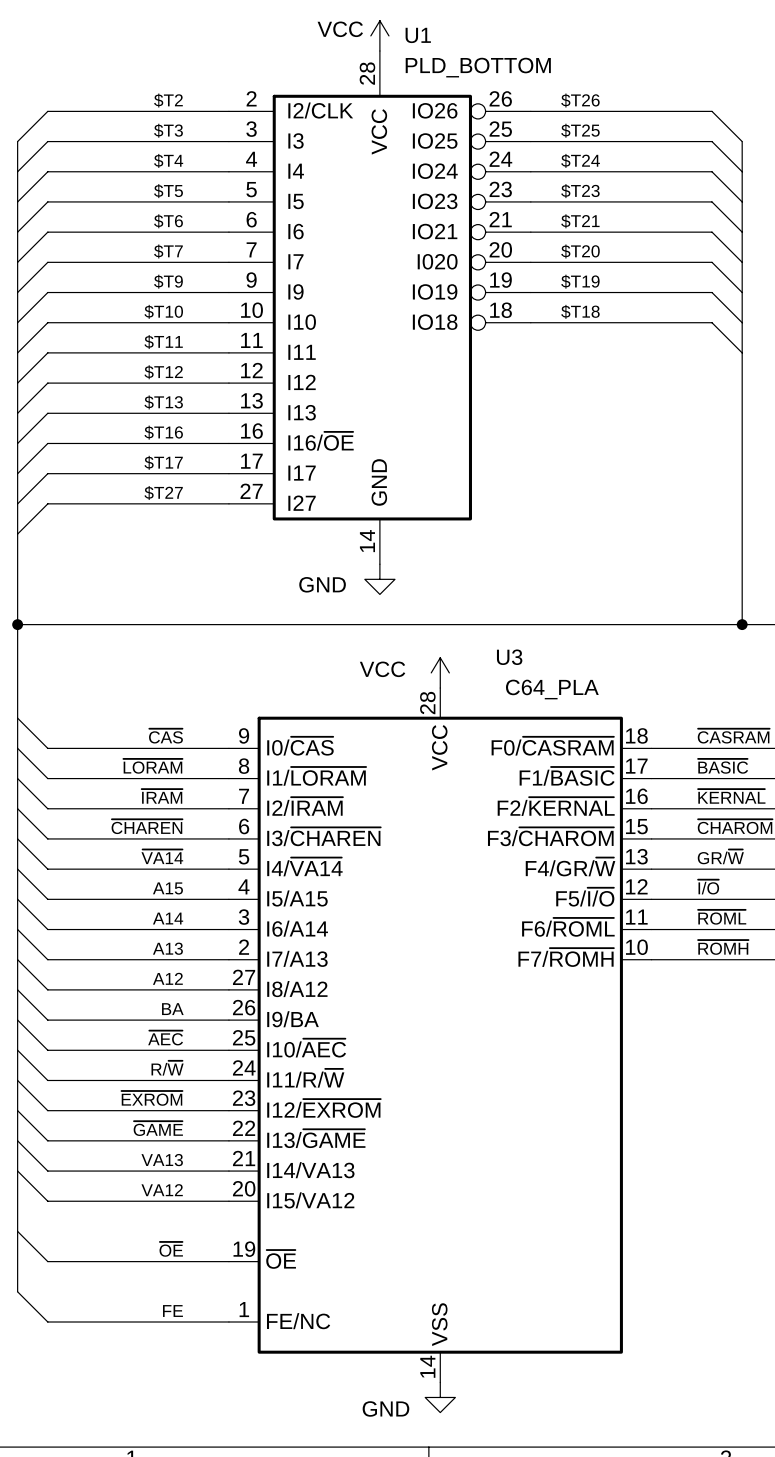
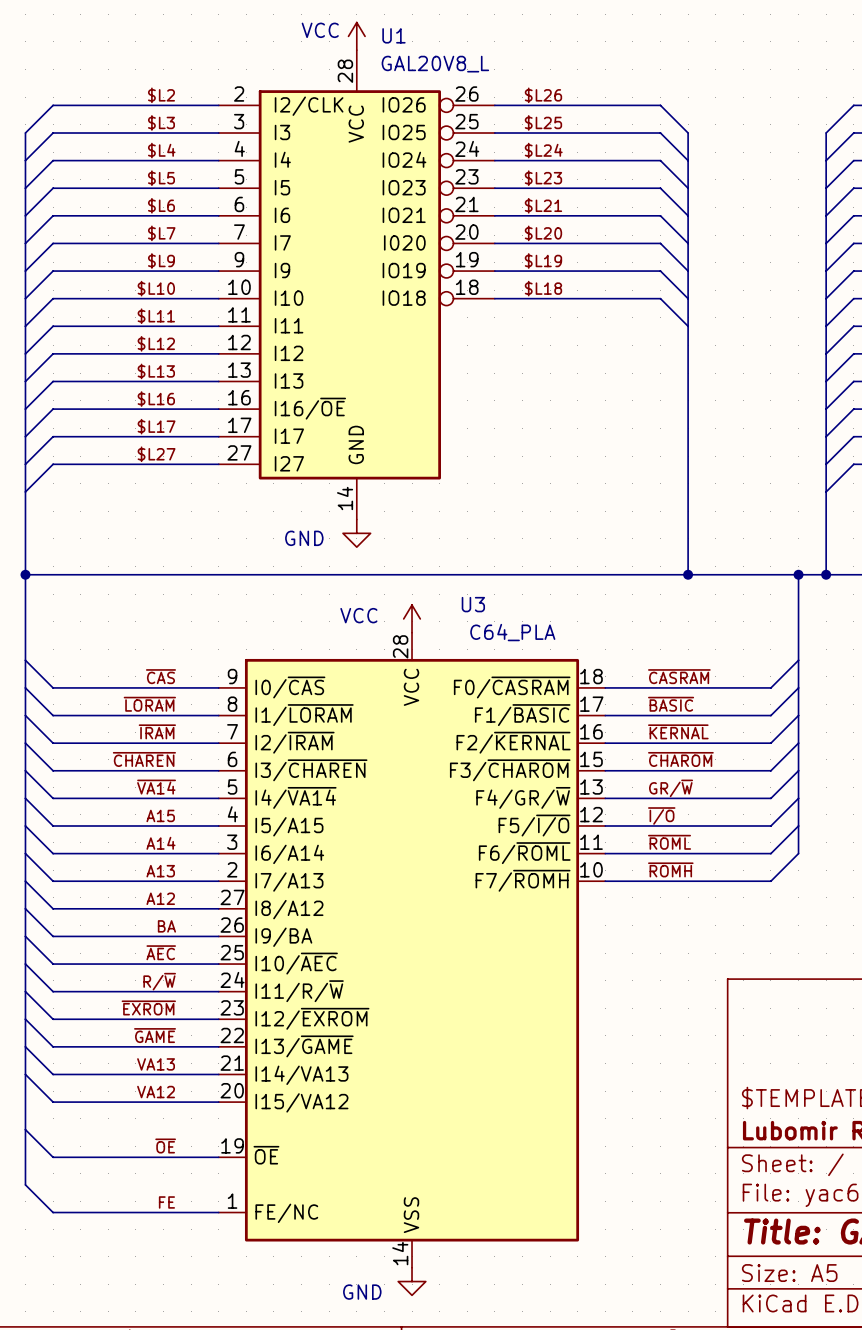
U1 value: PLD_BOTTOM (478, 67) -> GAL20V8_L (435, 64)
label: $T2 (168, 100) -> $L2 (161, 95)
label: $T26 (580, 100) -> $L26 (543, 95)
label: $T3 (168, 130) -> $L3 (161, 122)
label: $T25 (580, 130) -> $L25 (543, 122)
label: $T4 (168, 160) -> $L4 (161, 150)
label: $T24 (580, 160) -> $L24 (543, 150)
label: $T5 (168, 191) -> $L5 (161, 178)
label: $T23 (580, 191) -> $L23 (543, 178)
label: $T6 (168, 221) -> $L6 (161, 205)
label: $T21 (580, 221) -> $L21 (543, 205)
label: $T7 (168, 251) -> $L7 (161, 233)
label: $T20 (580, 251) -> $L20 (543, 233)
label: $T9 (168, 281) -> $L9 (161, 260)
label: $T19 (580, 281) -> $L19 (543, 260)
label: $T10 (163, 311) -> $L10 (156, 288)
label: $T18 (580, 311) -> $L18 (543, 288)
label: $T11 (163, 342) -> $L11 (156, 316)
label: $T12 (163, 372) -> $L12 (156, 343)
label: $T13 (163, 402) -> $L13 (156, 371)
label: $T16 (163, 432) -> $L16 (156, 399)
label: $T17 (163, 462) -> $L17 (156, 426)
label: $T27 (163, 493) -> $L27 (156, 454)

